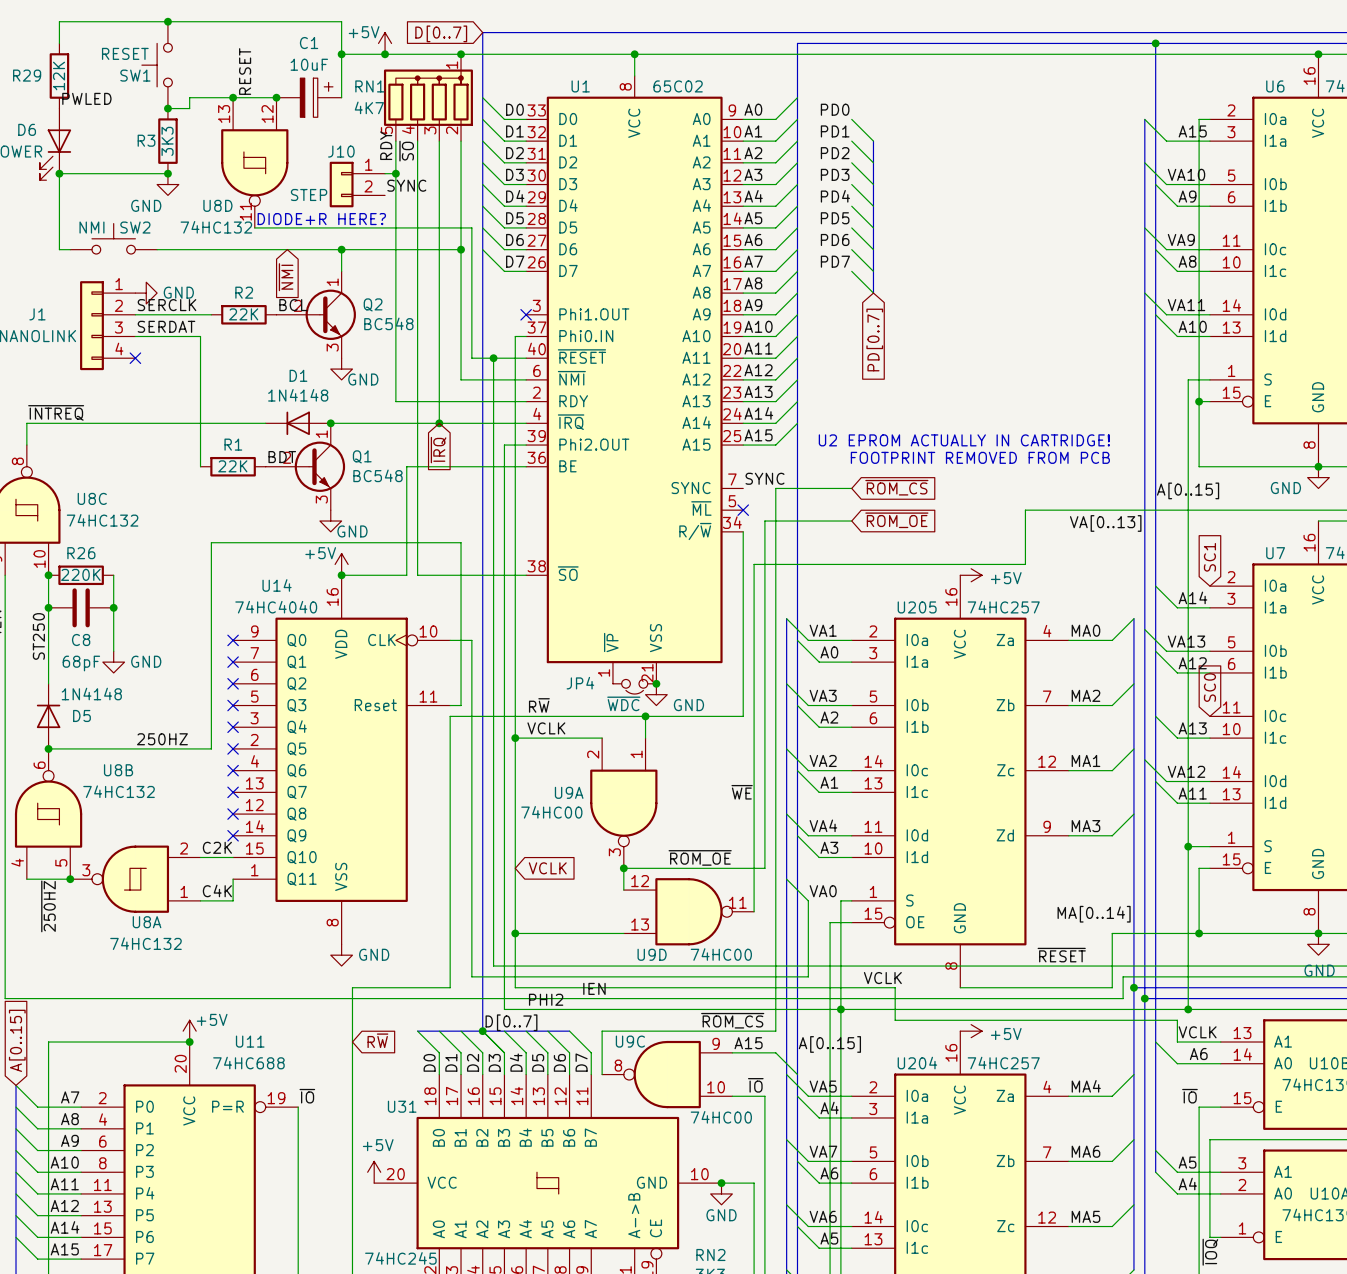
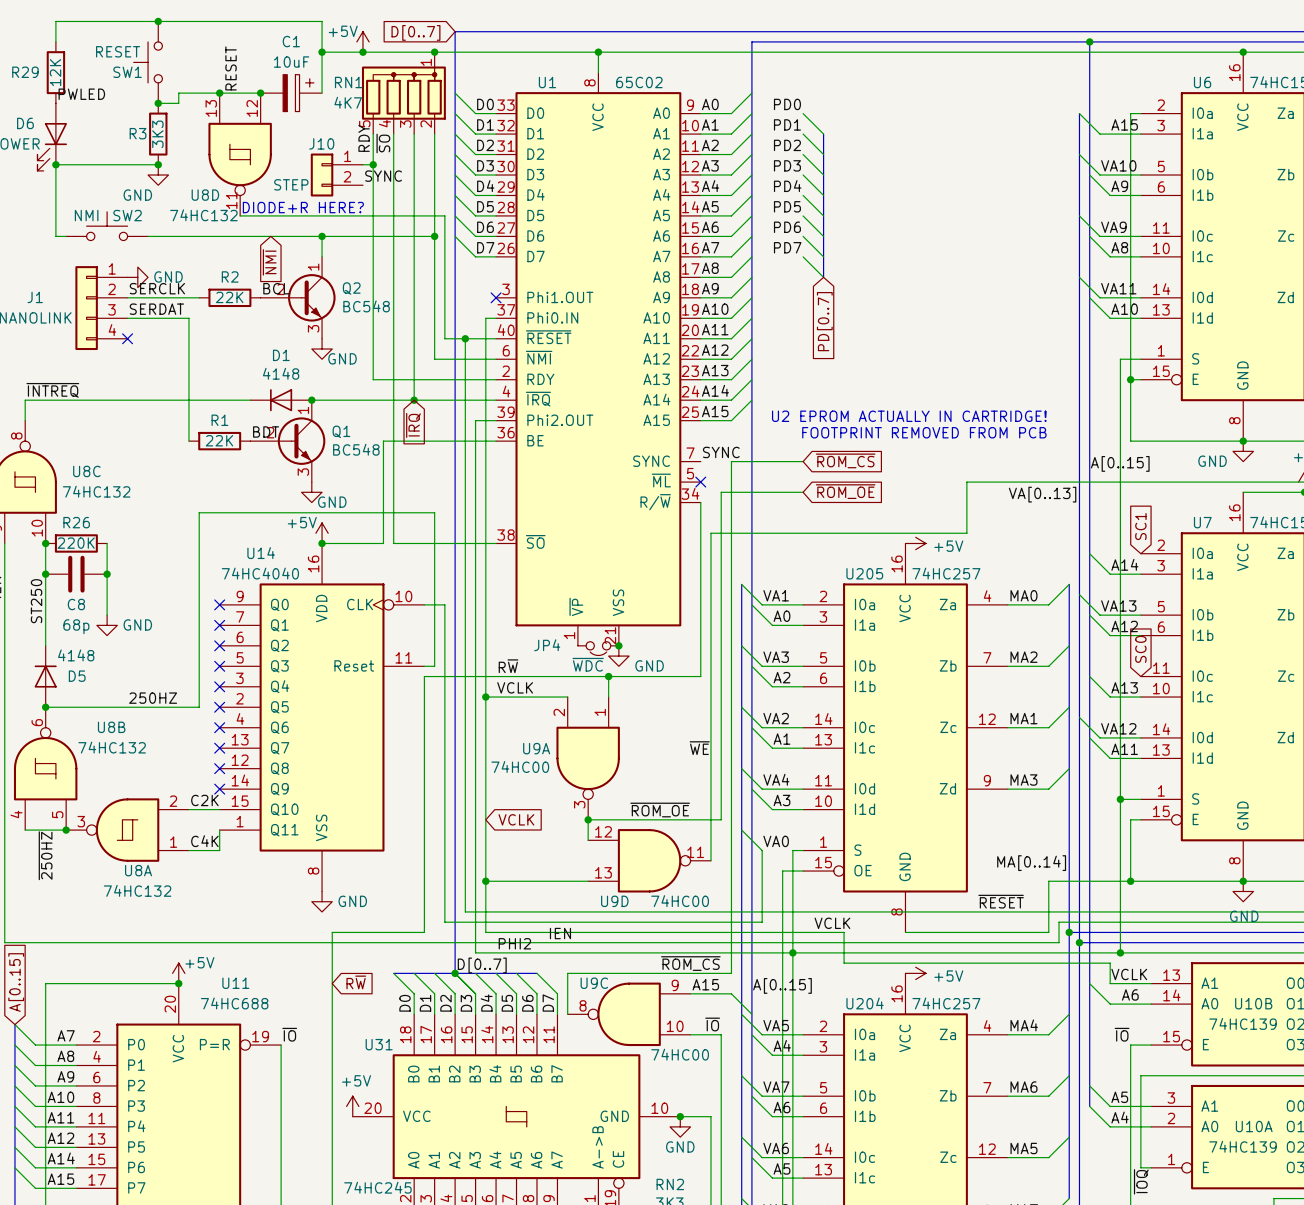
D1 value: 1N4148 (298, 395) -> 4148 (281, 373)
C8 value: 68pF (81, 663) -> 68p (76, 626)
D5 value: 1N4148 (91, 694) -> 4148 (76, 655)

